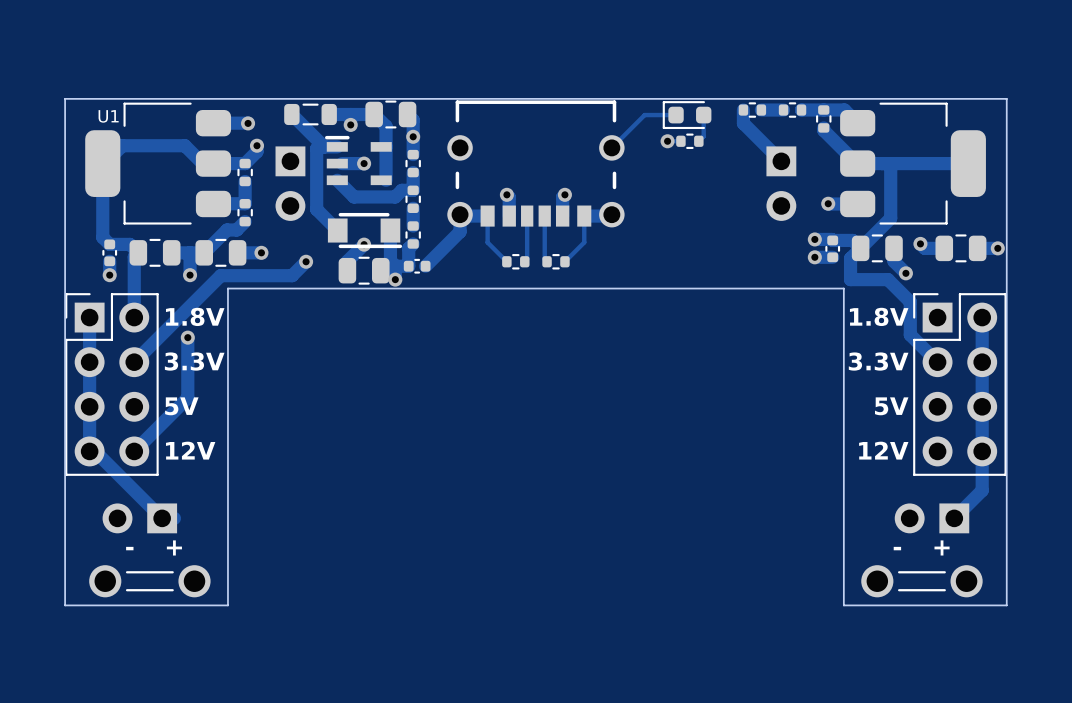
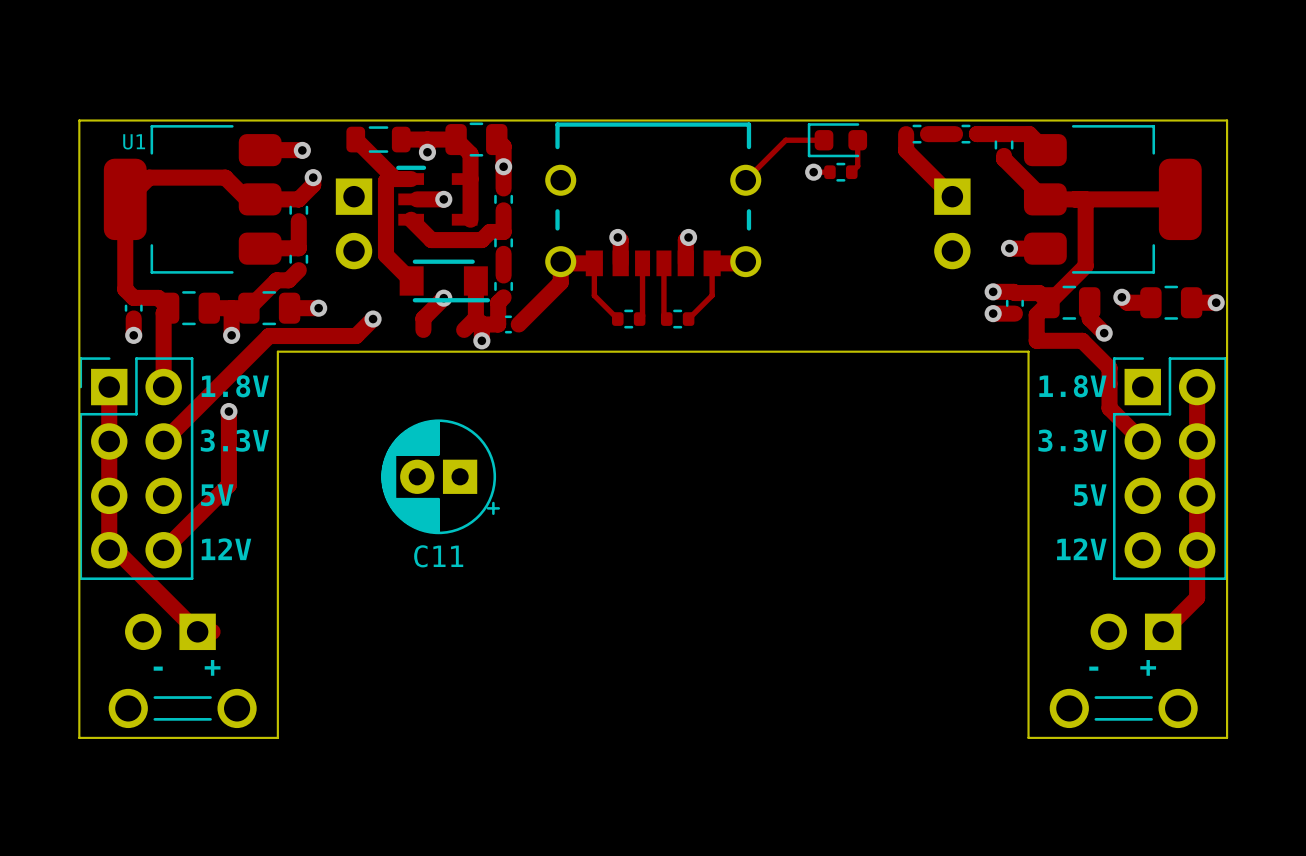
part: (364, 270) -> none
C11: none -> (440, 476)

